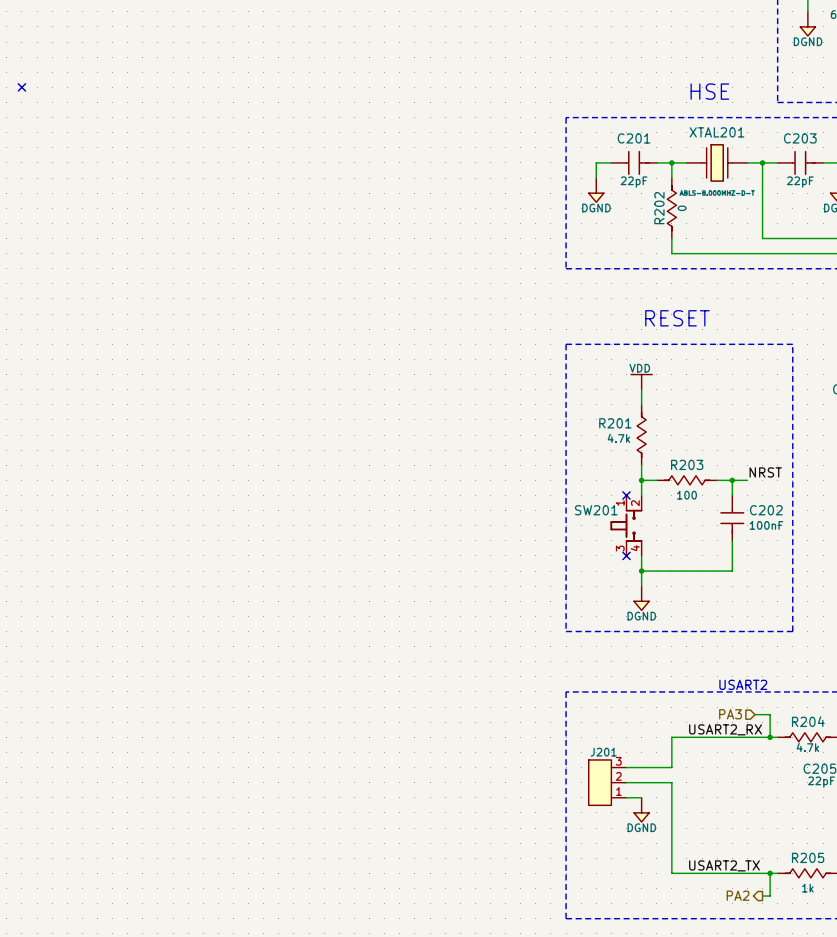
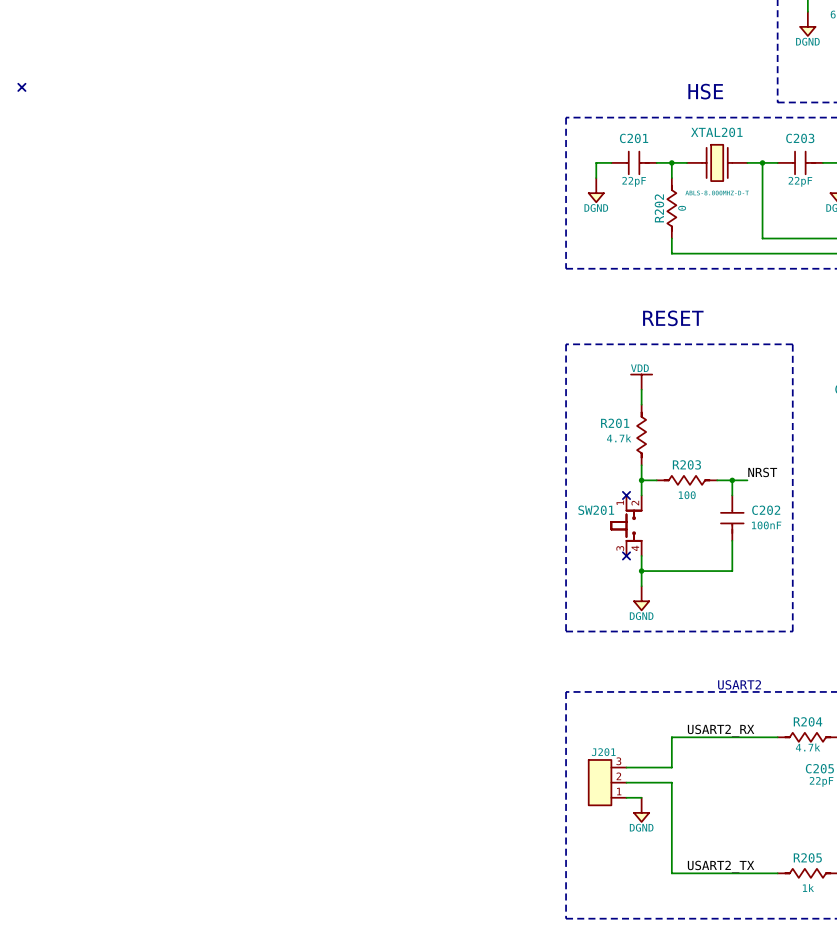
hierarchical label: PA3 (730, 714) -> none
wire: (754, 714) (770, 714) (770, 737) -> none
junction: (770, 737) -> none
wire: (770, 873) (770, 896) (762, 896) -> none
junction: (770, 873) -> none
hierarchical label: PA2 (738, 895) -> none

